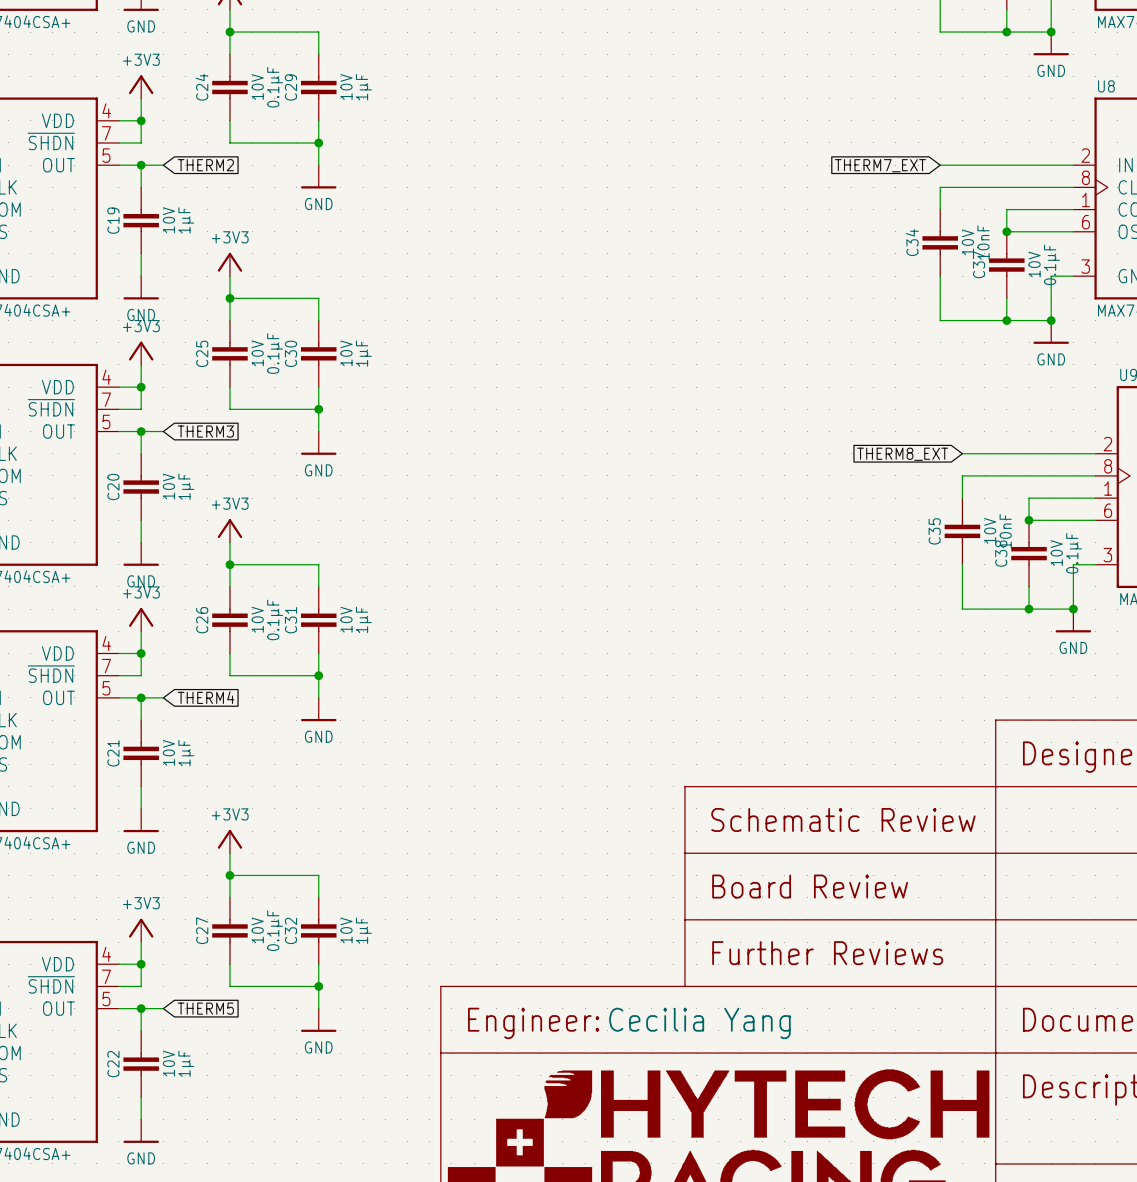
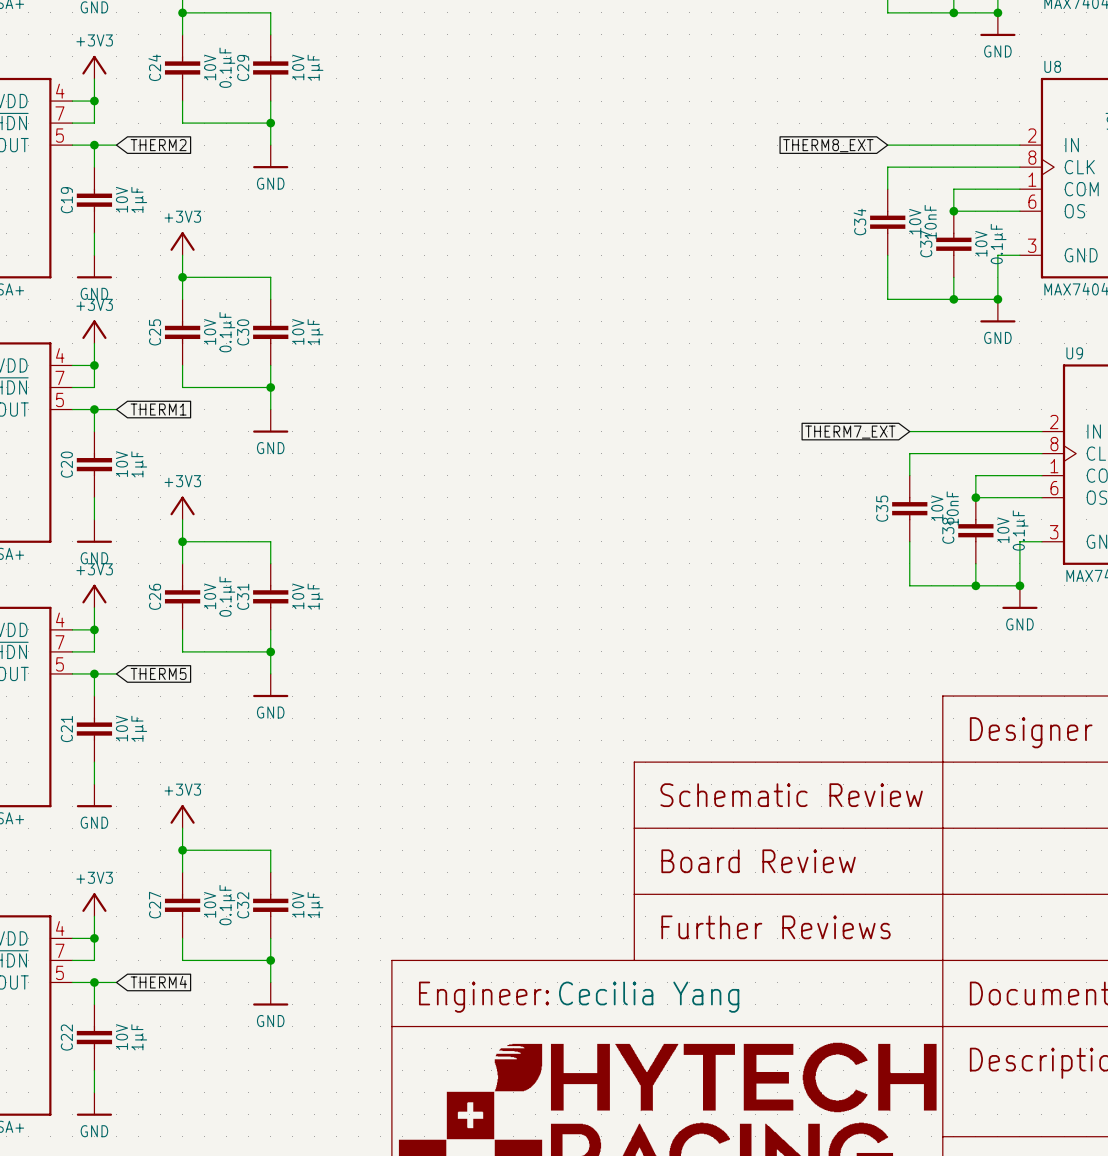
global label: THERM7_EXT (880, 165) -> THERM8_EXT (828, 145)
global label: THERM3 (205, 431) -> THERM1 (158, 409)
global label: THERM8_EXT (902, 454) -> THERM7_EXT (850, 432)
global label: THERM4 (206, 697) -> THERM5 (158, 673)
global label: THERM5 (205, 1008) -> THERM4 (158, 982)

